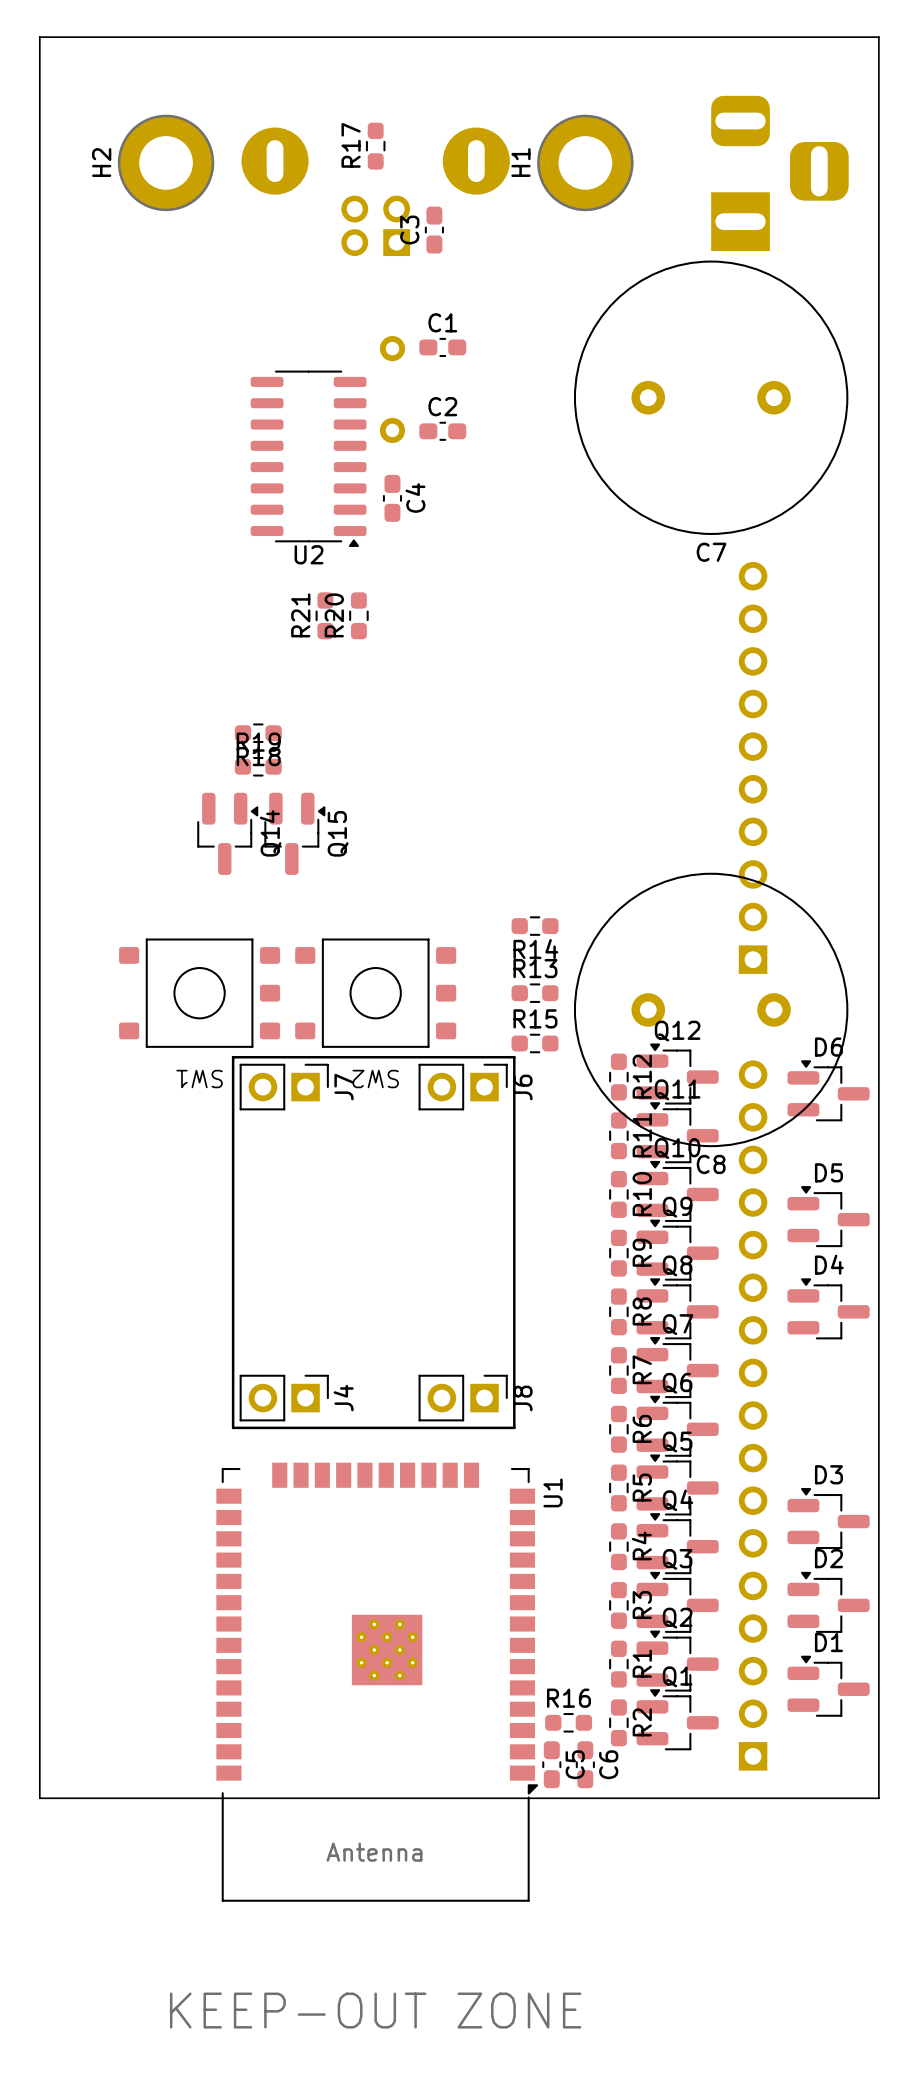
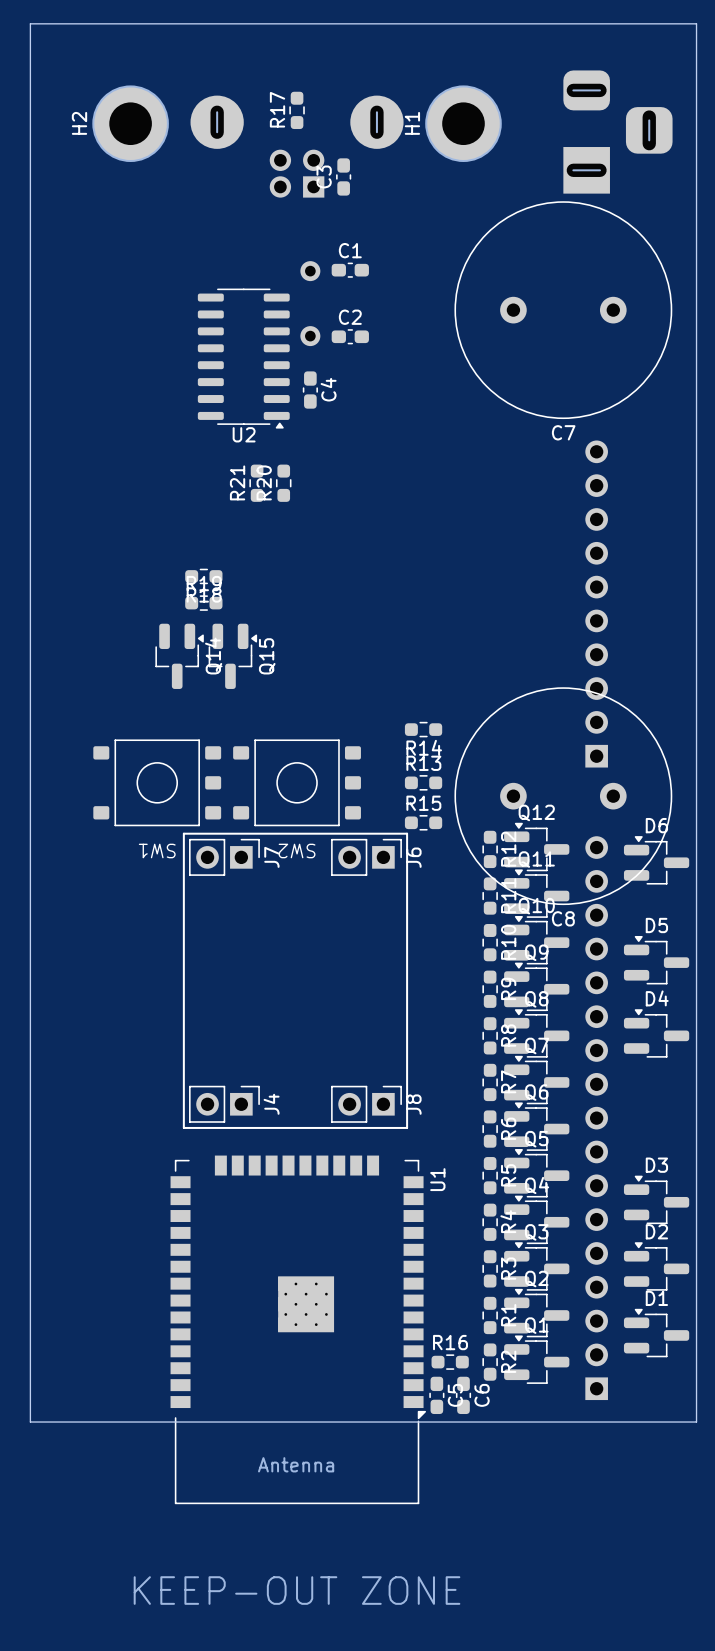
line: none -> (573, 90) (599, 90)
line: none -> (217, 112) (217, 132)
line: none -> (376, 112) (376, 132)
line: none -> (649, 120) (649, 140)
line: none -> (573, 170) (599, 170)

